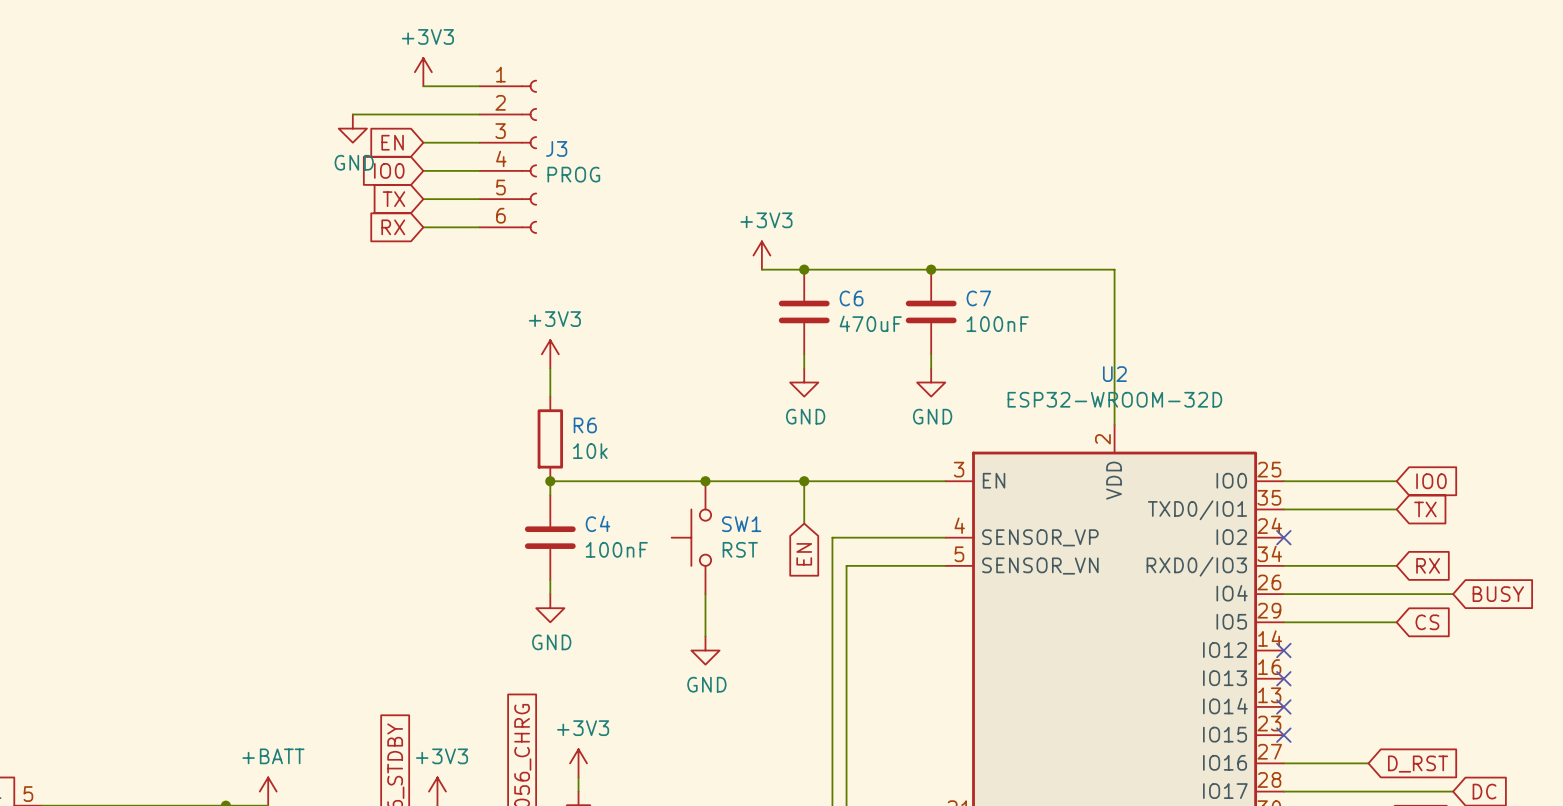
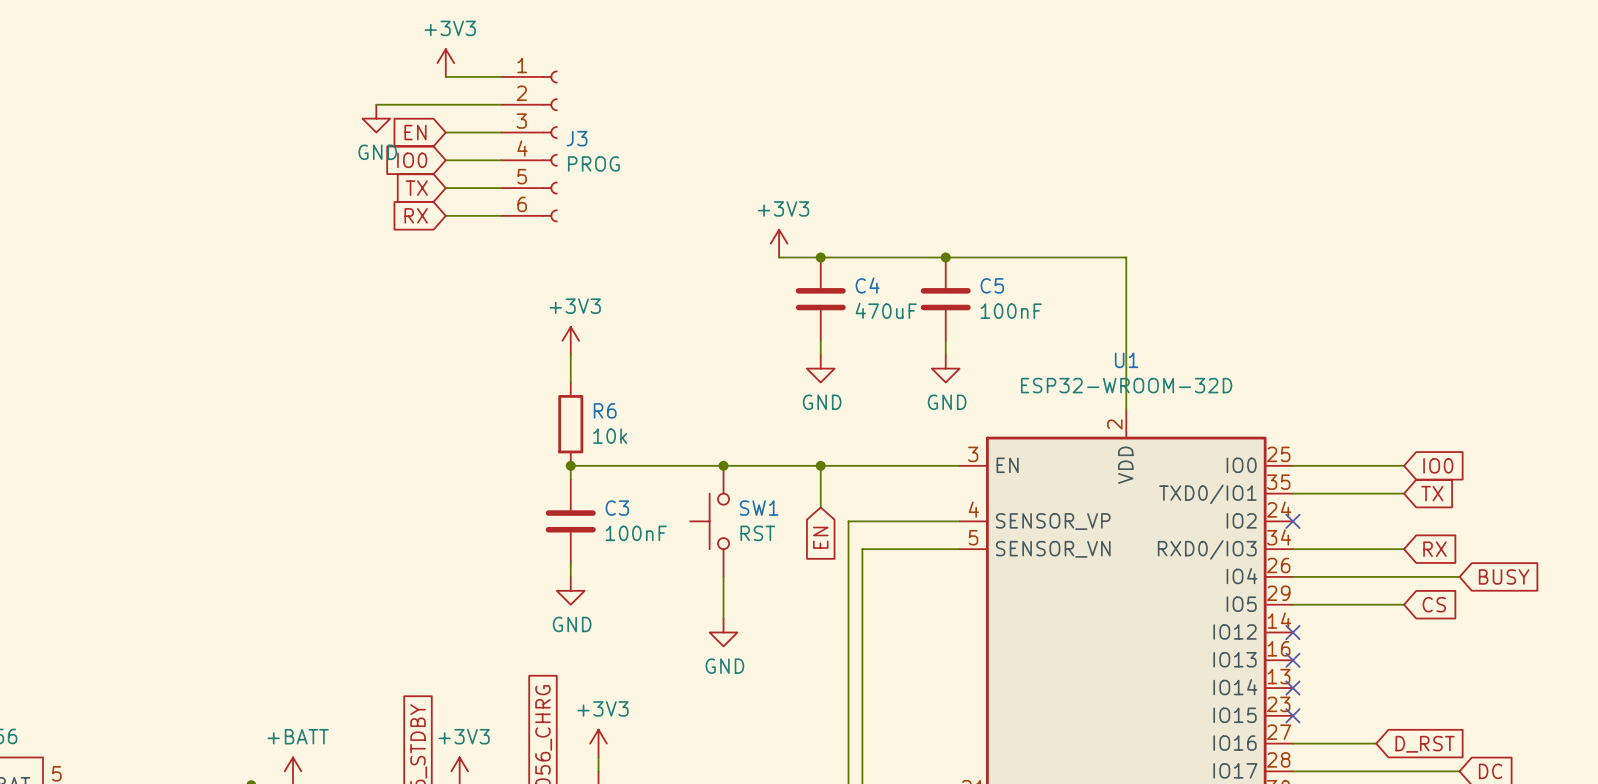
C6 name: C6 (851, 298) -> C4 (867, 285)
C7 name: C7 (978, 298) -> C5 (992, 285)
U2 name: U2 (1114, 374) -> U1 (1126, 360)
C4 name: C4 (597, 523) -> C3 (617, 508)

